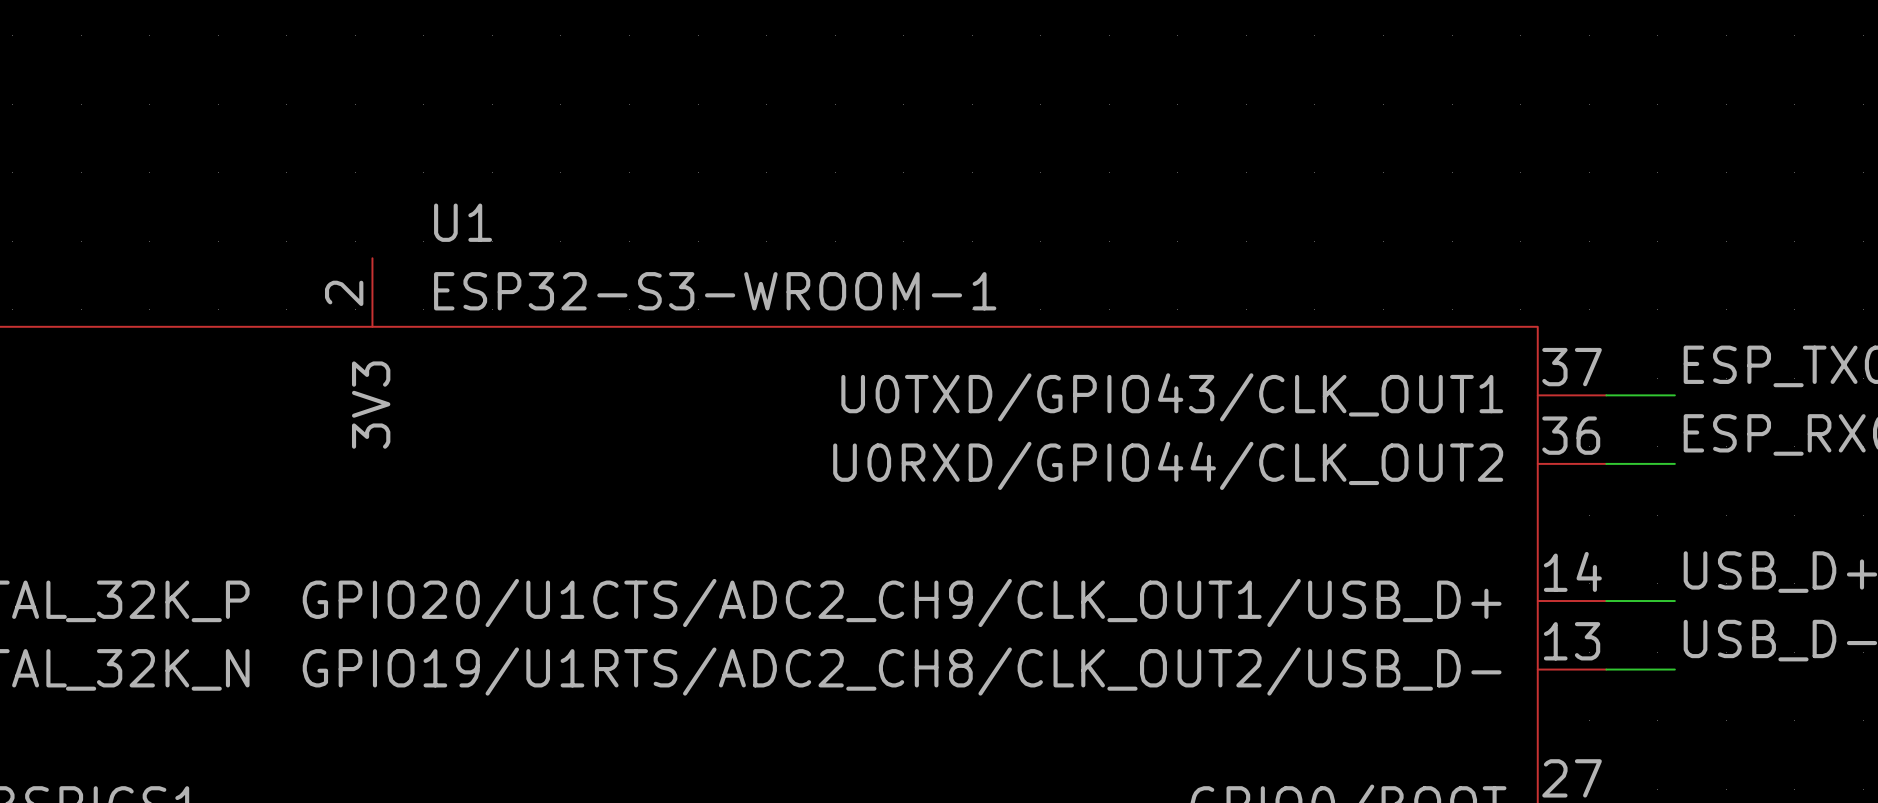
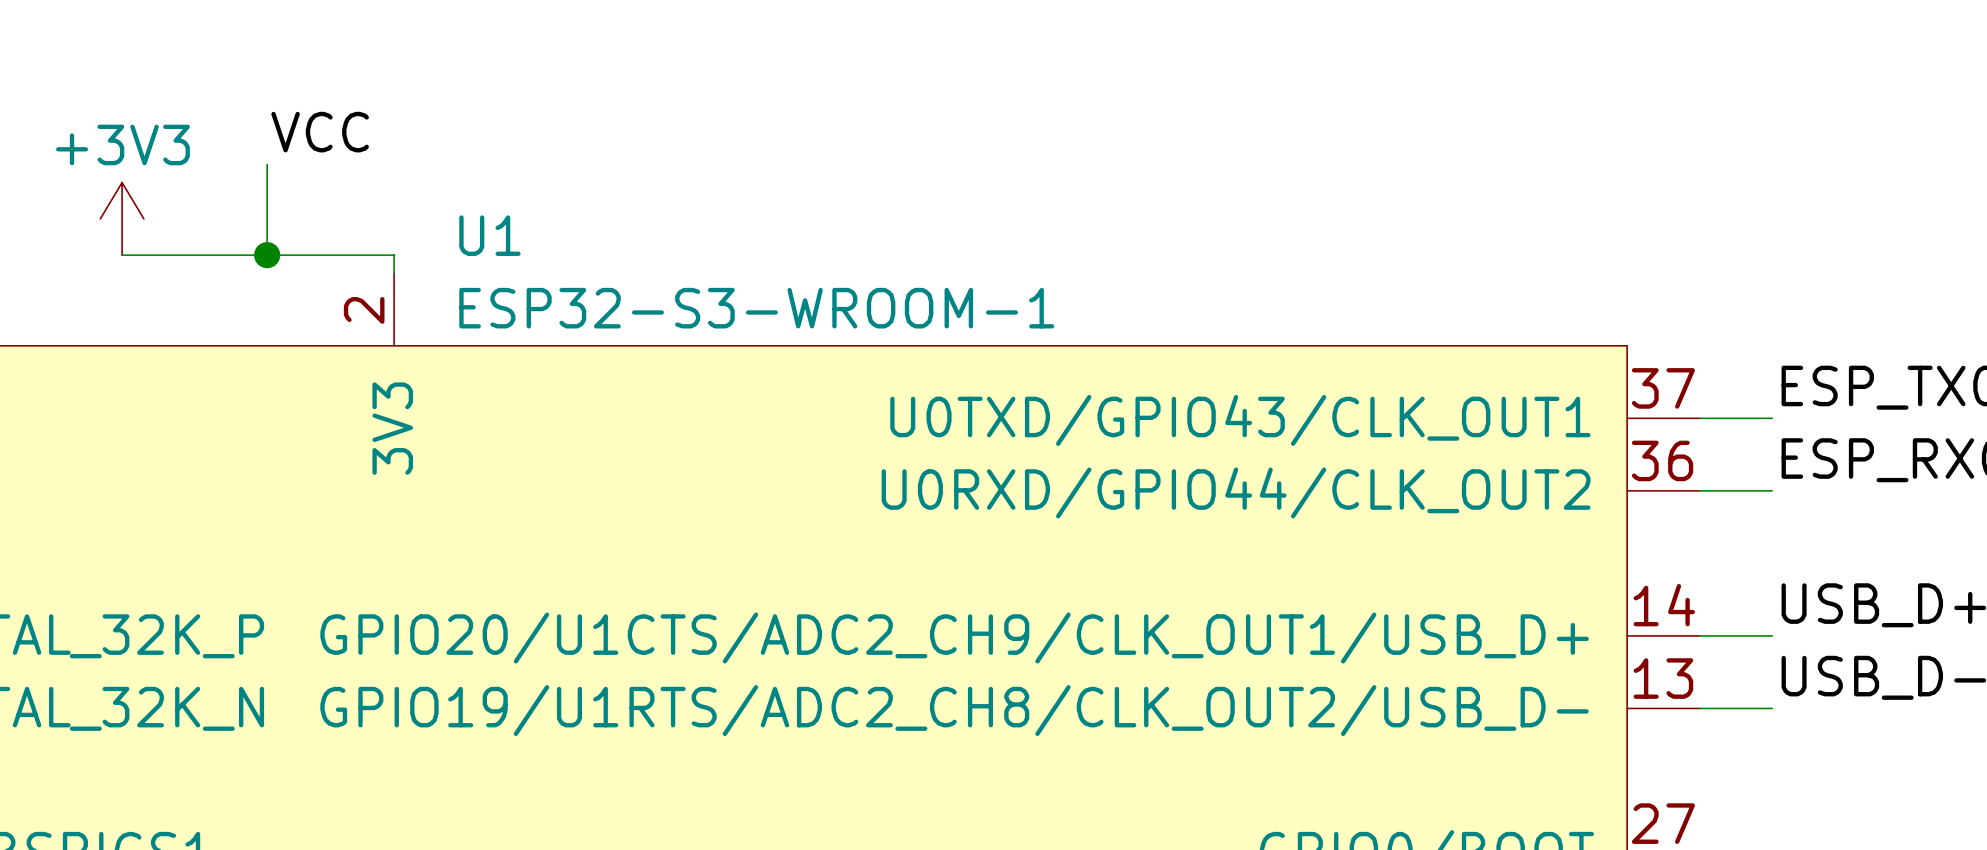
label: none -> VCC (320, 132)
wire: none -> (267, 164) (267, 255)
power symbol: none -> +3V3 (122, 218)
wire: none -> (122, 255) (394, 255) (394, 273)
junction: none -> (267, 255)

